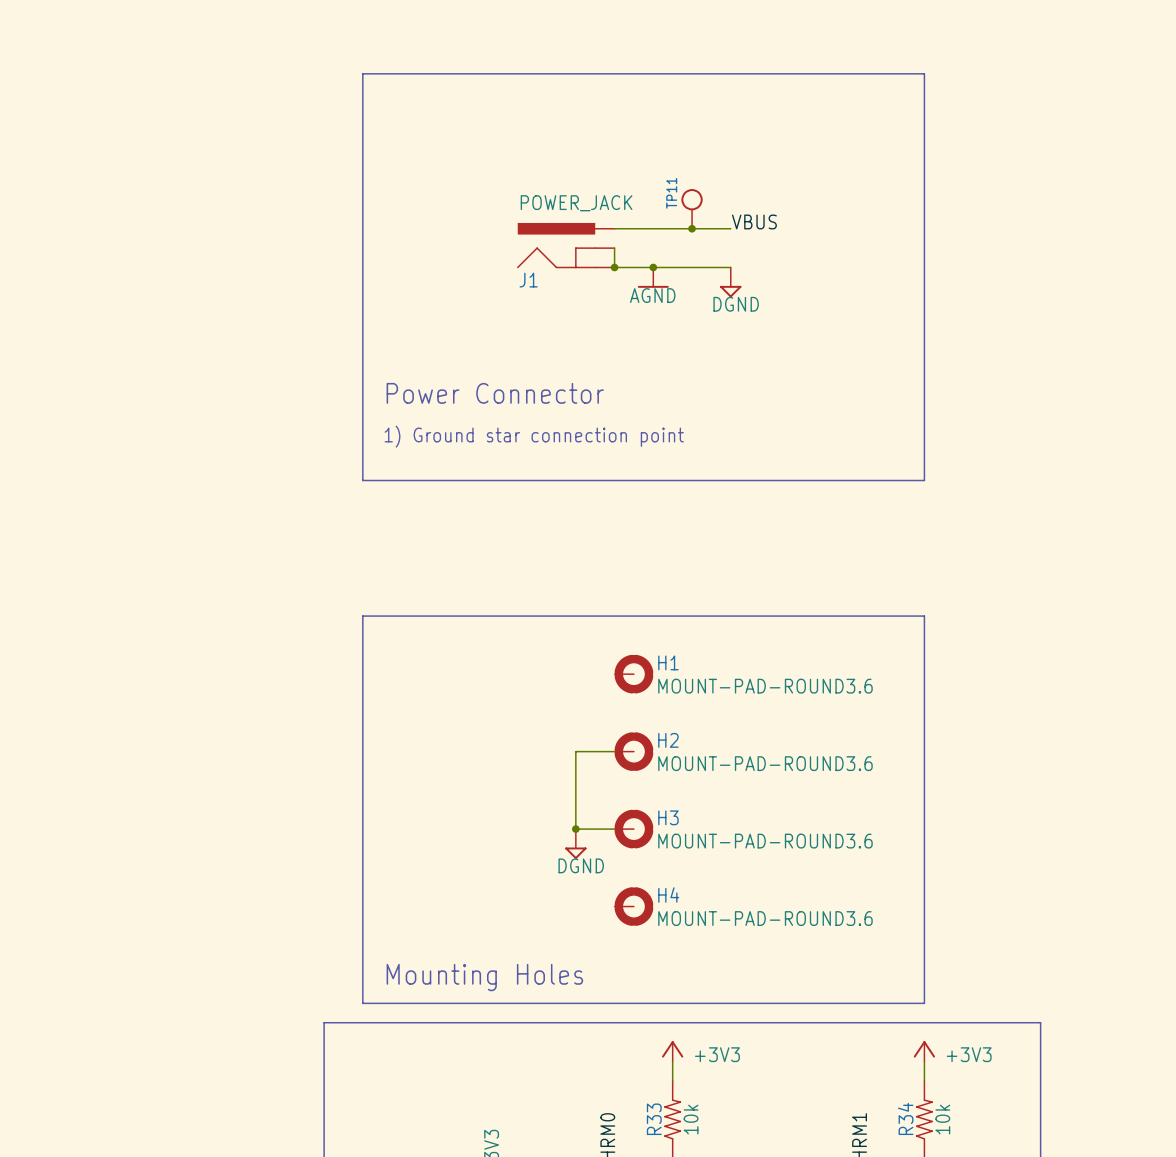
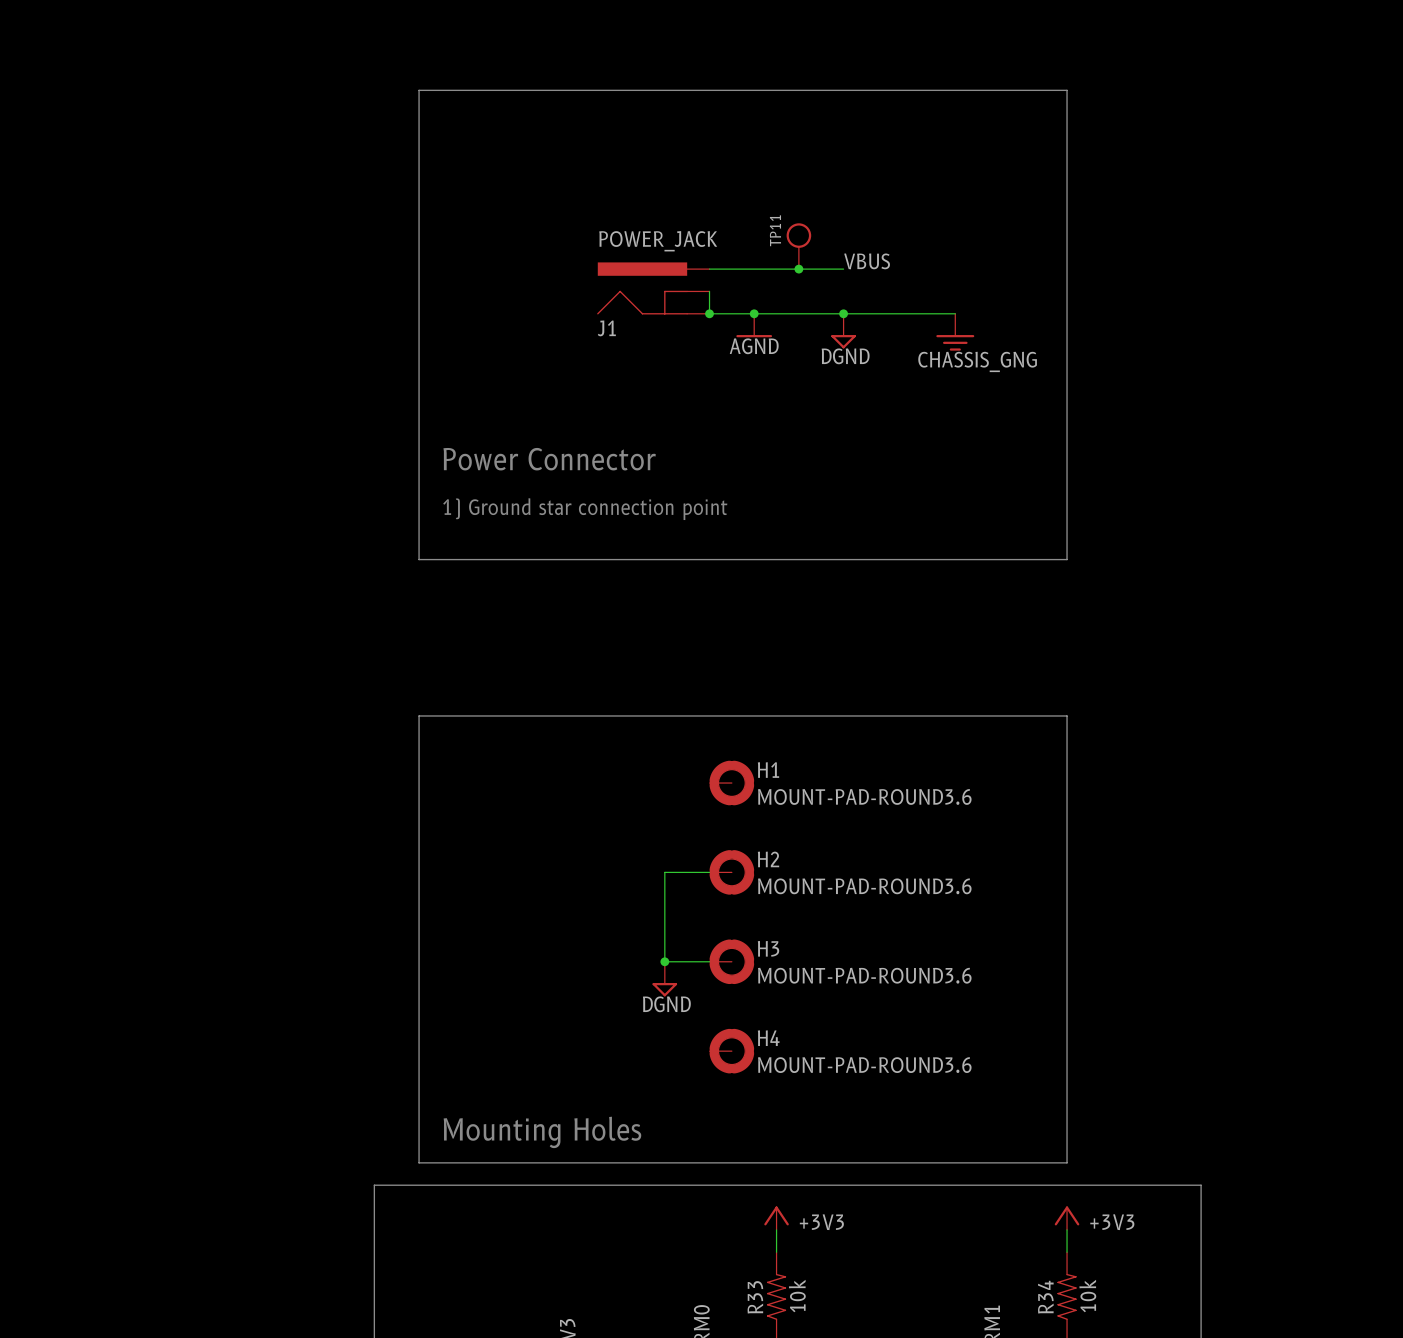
wire: none -> (843, 313) (955, 313)
junction: none -> (843, 313)
power symbol: none -> CHASSIS_GNG (955, 332)

